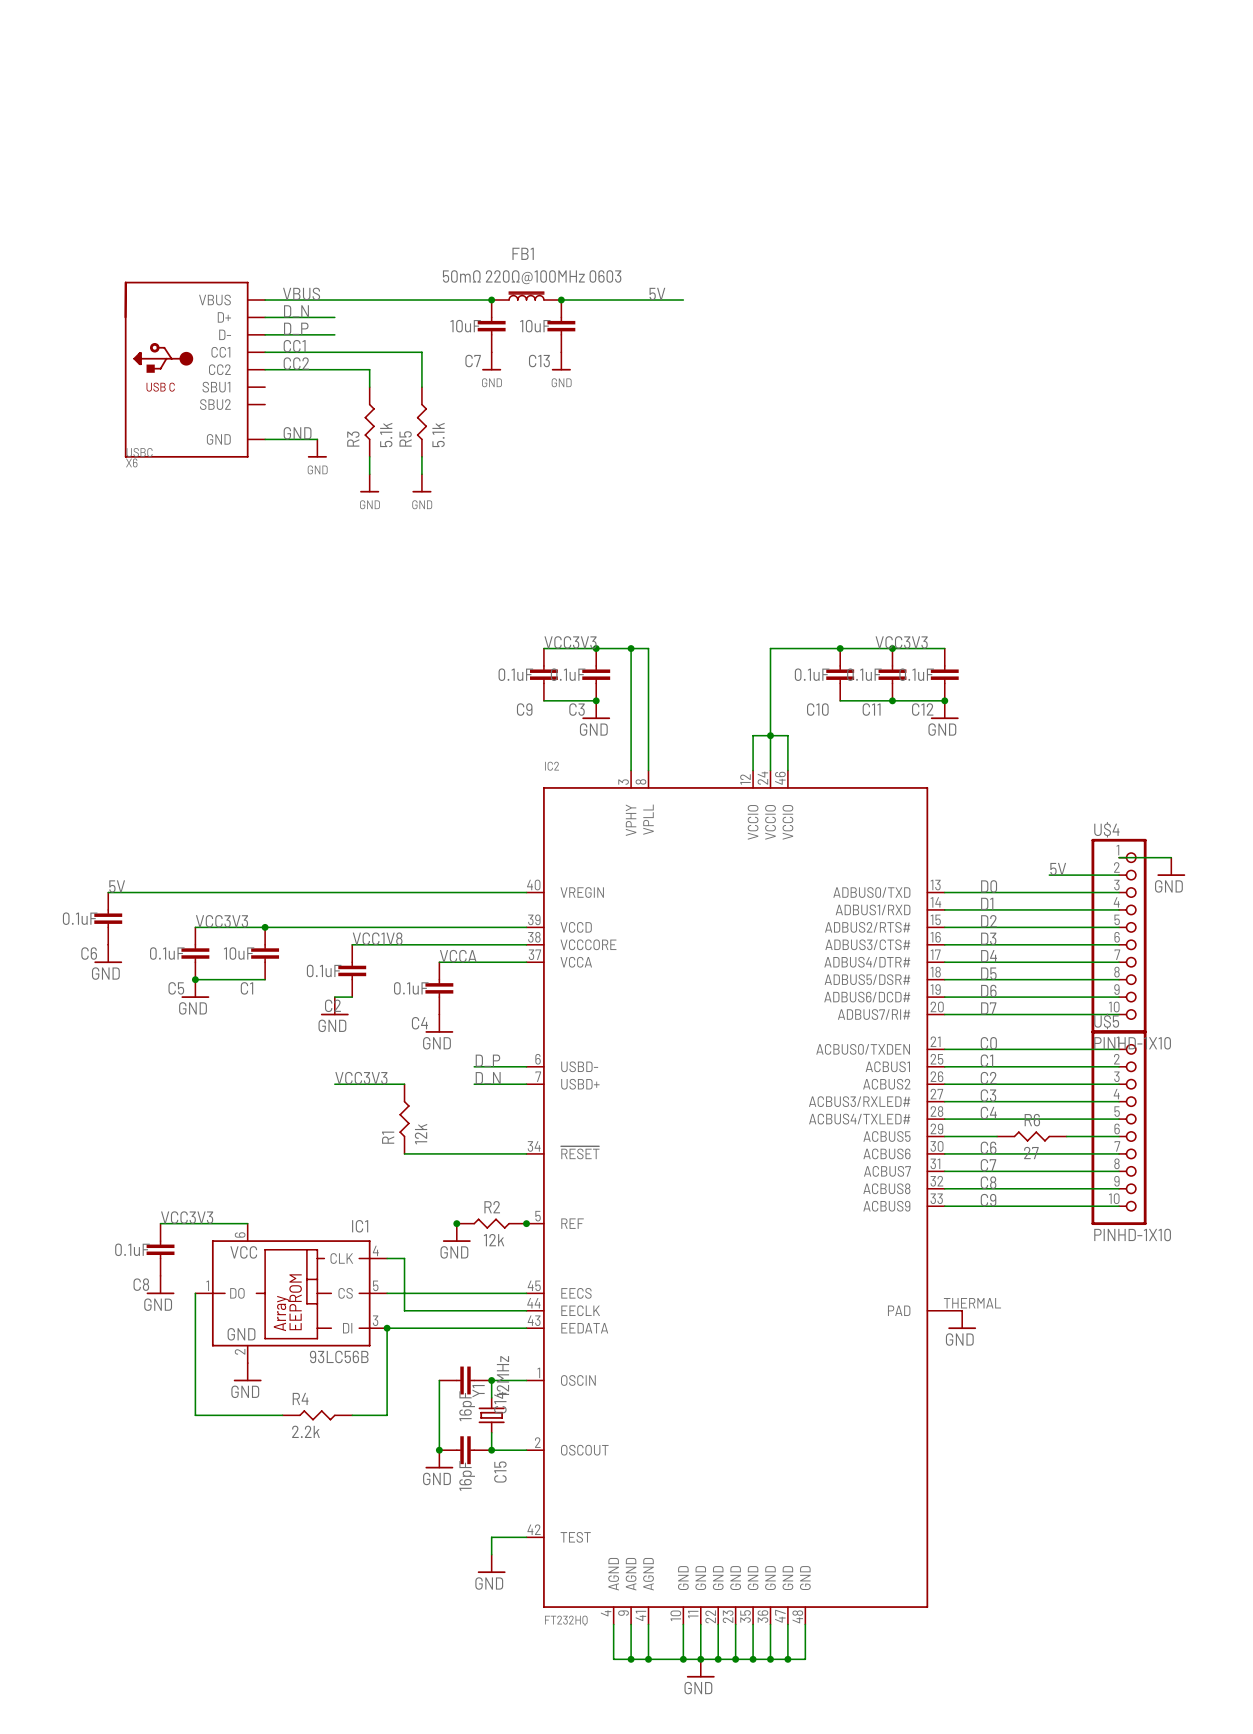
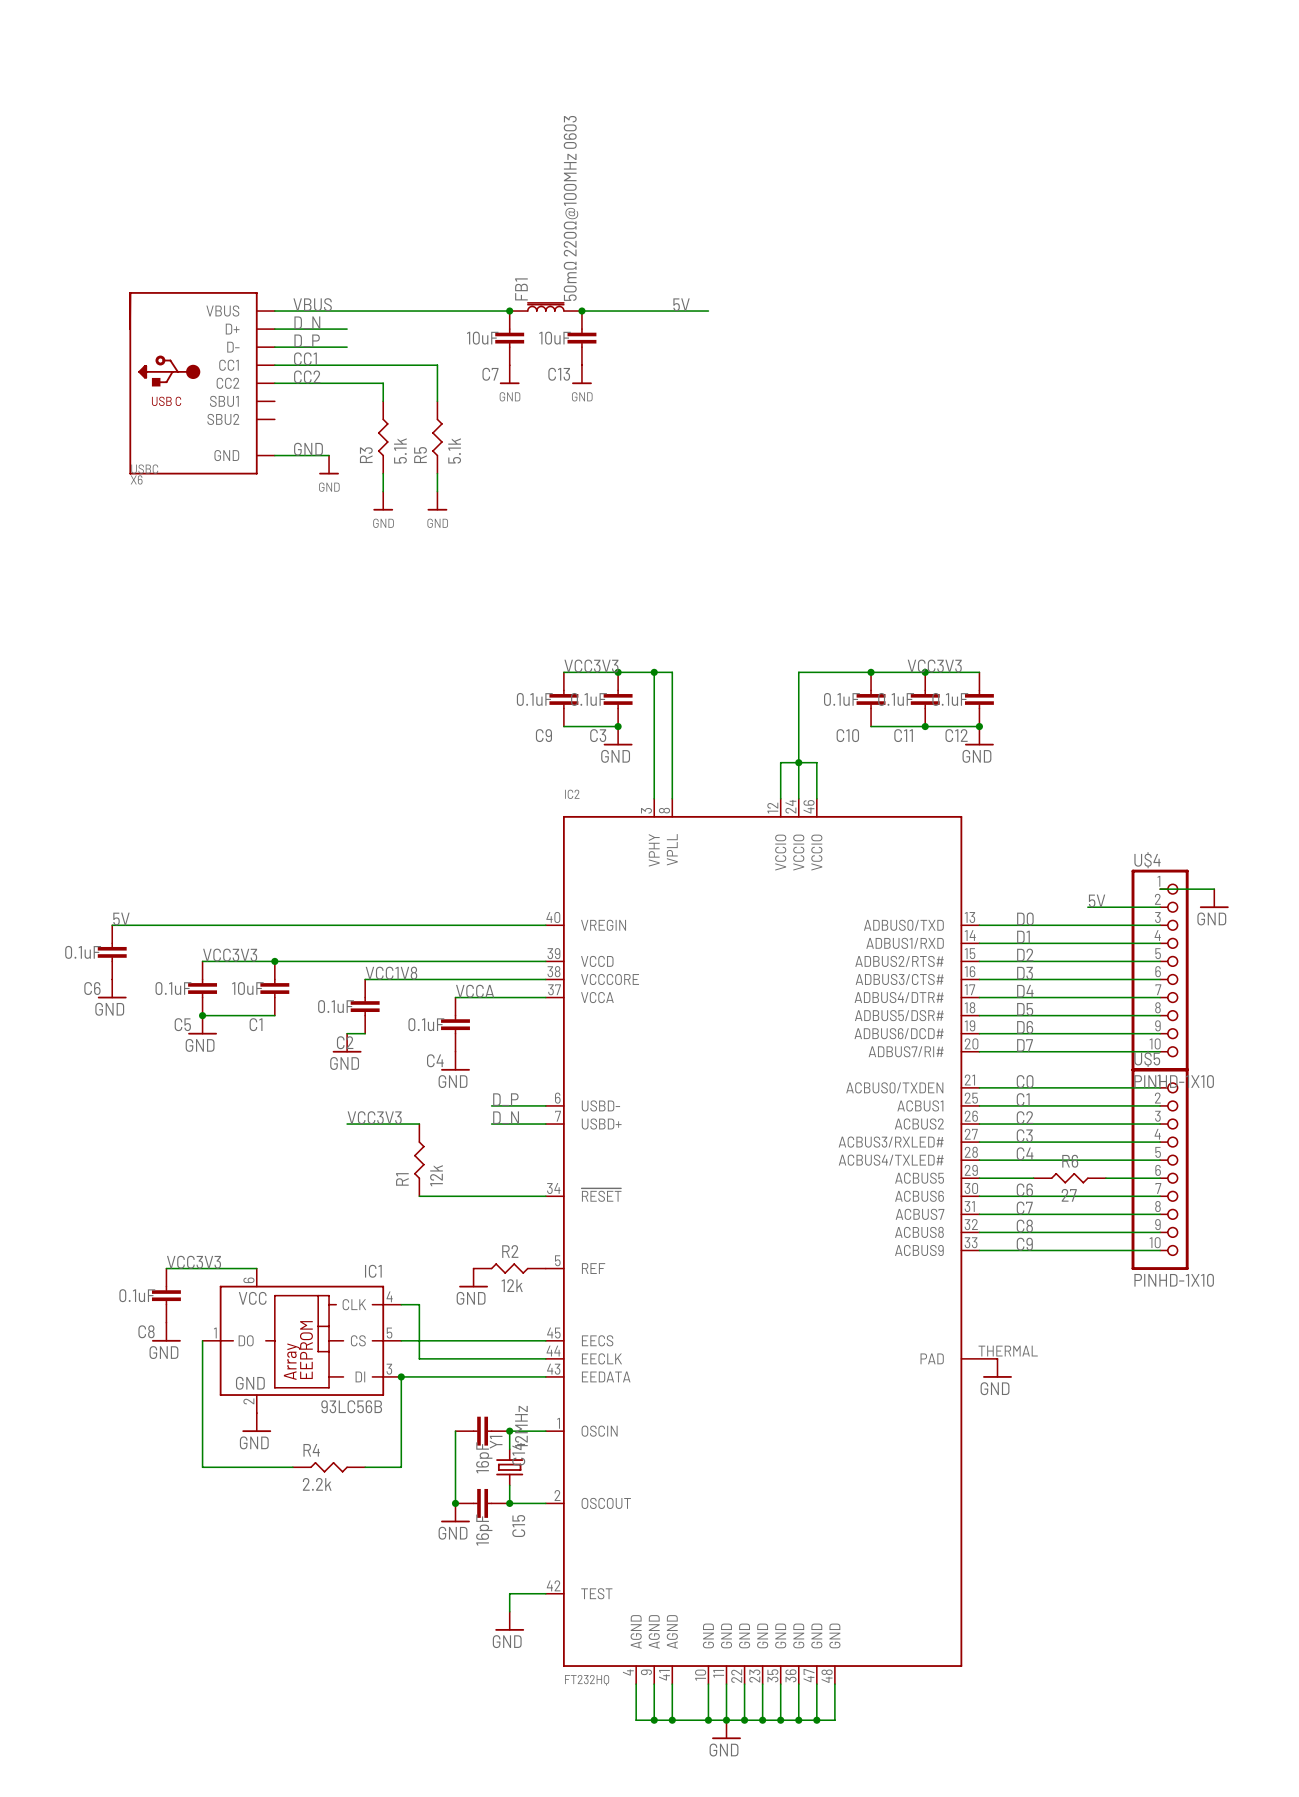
FB1 name rotation: 0° (523, 253) -> 90° counterclockwise (521, 289)
FB1 value rotation: 0° (532, 277) -> 90° counterclockwise (570, 208)
junction: (456, 1223) -> none
junction: (526, 1223) -> none

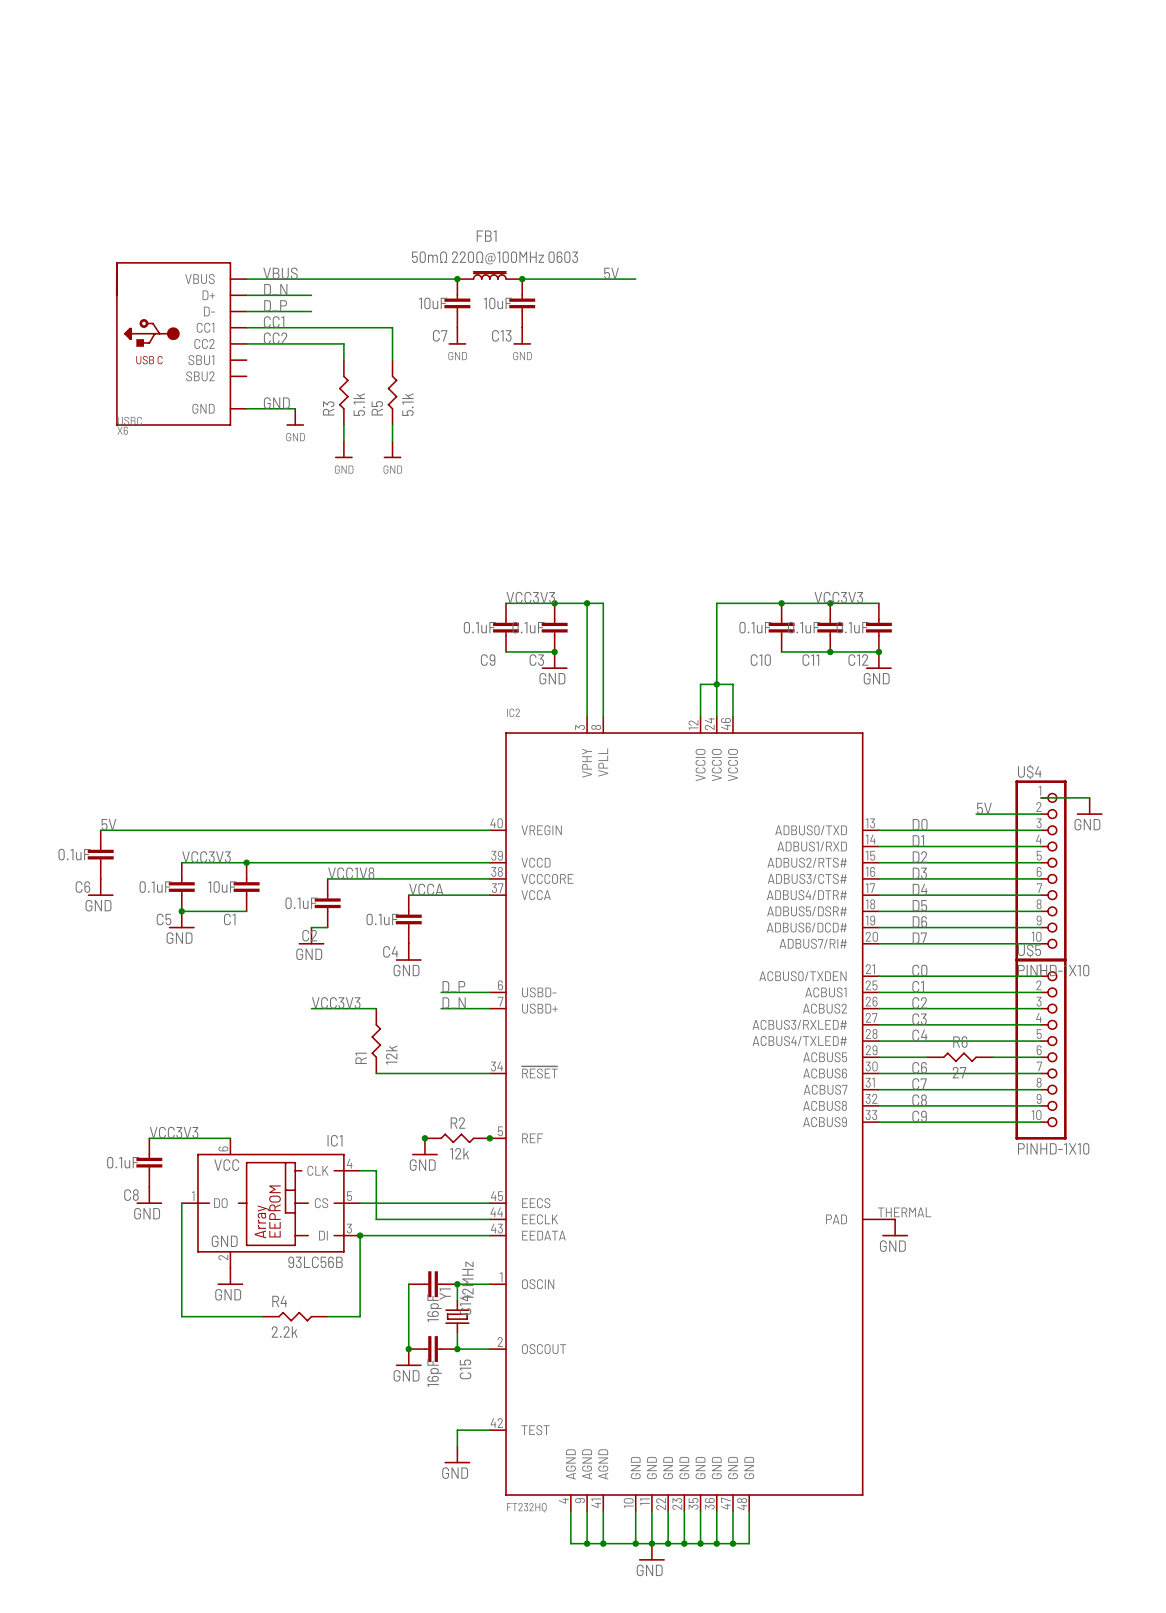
FB1 value rotation: 0° (570, 208) -> 90° clockwise (495, 257)
FB1 name rotation: 0° (521, 289) -> 90° clockwise (486, 236)
junction: none -> (424, 1138)
junction: none -> (489, 1138)

